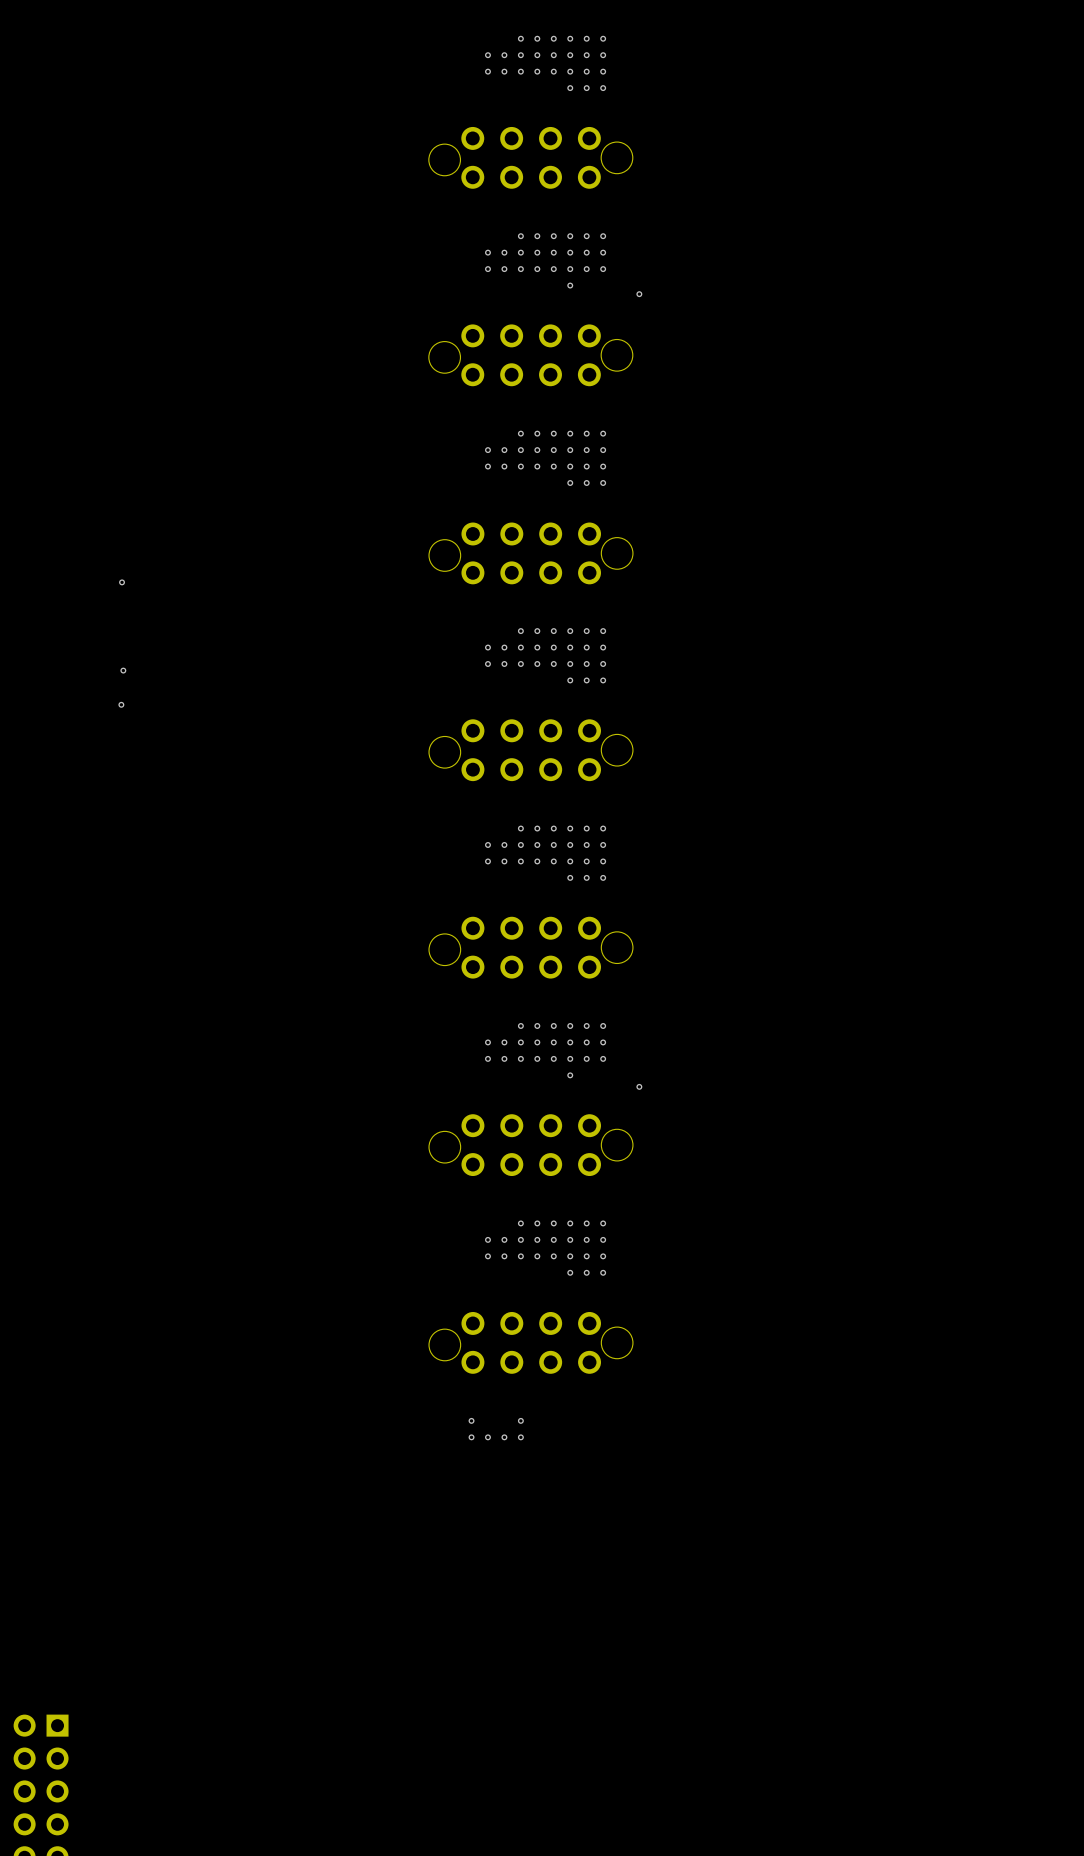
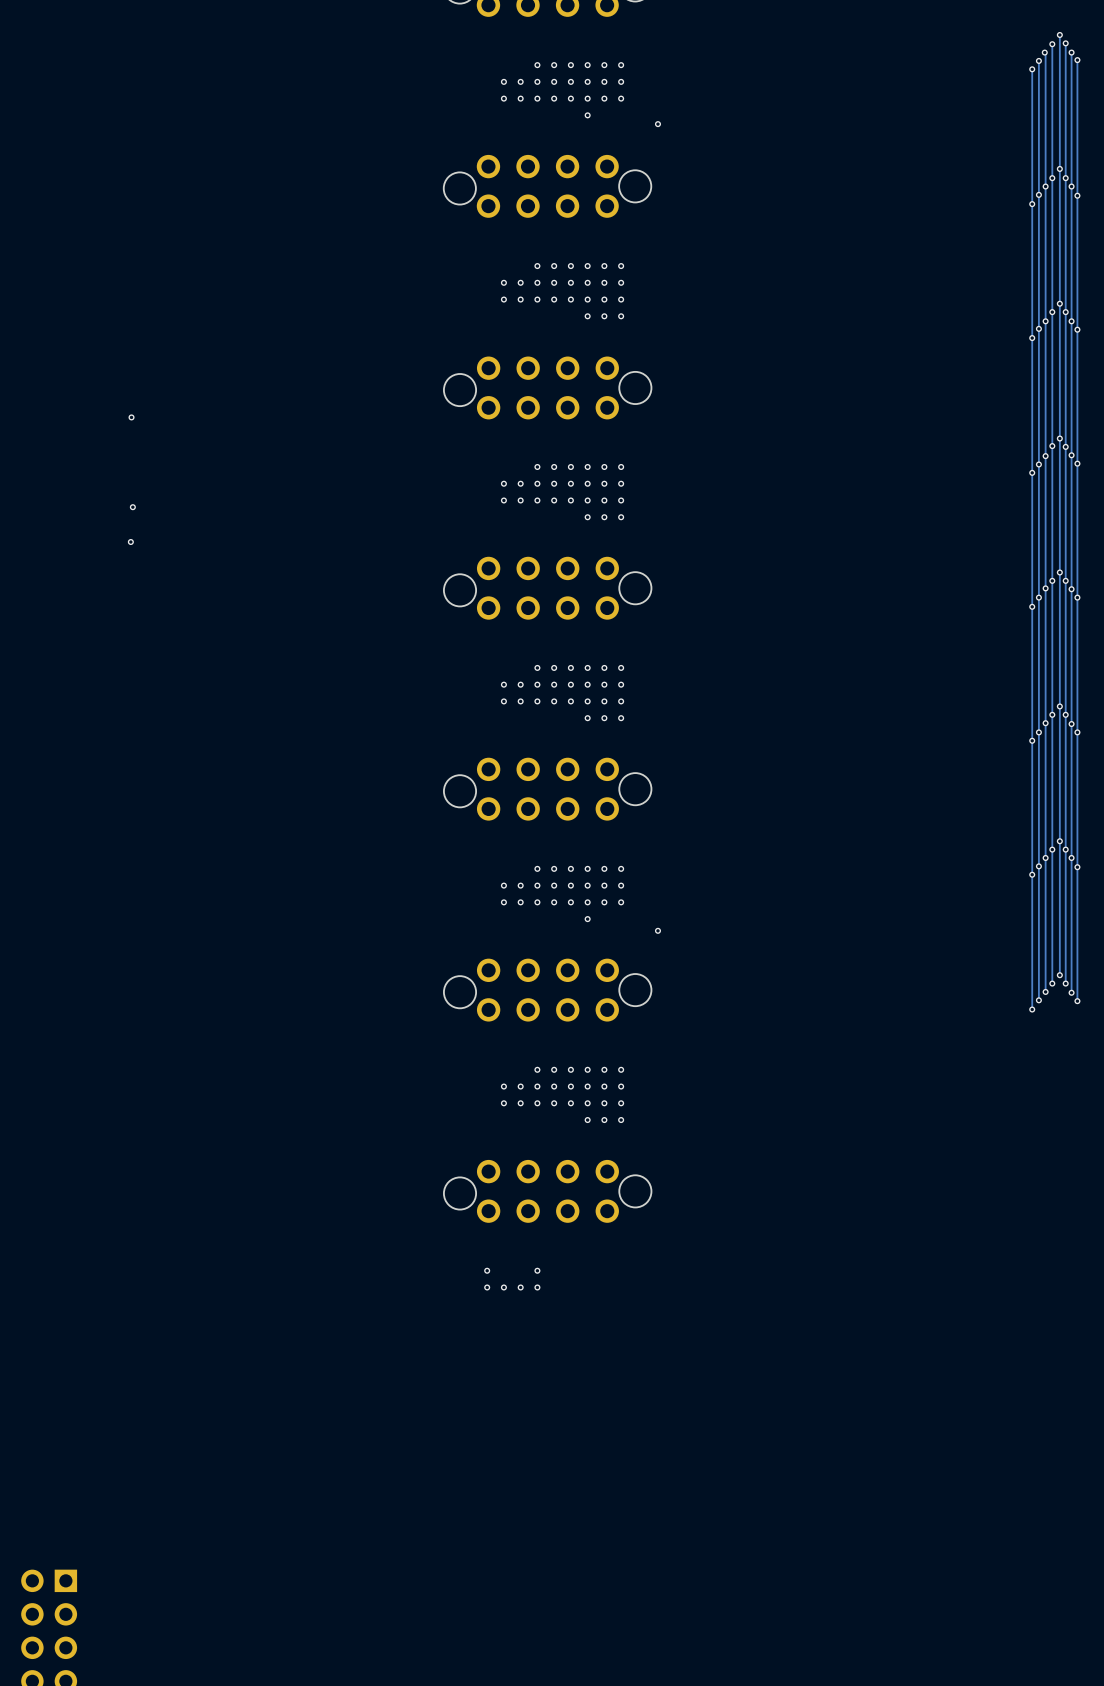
track: none -> (1059, 34) (1059, 975)
via: none -> (1059, 34)
track: none -> (1065, 43) (1065, 983)
via: none -> (1065, 43)
track: none -> (1052, 44) (1052, 983)
via: none -> (1052, 44)
track: none -> (1044, 52) (1045, 991)
via: none -> (1044, 52)
track: none -> (1071, 52) (1071, 992)
via: none -> (1071, 52)
track: none -> (1077, 60) (1077, 1001)
via: none -> (1077, 60)
track: none -> (1038, 60) (1038, 1000)
via: none -> (1038, 60)
track: none -> (1032, 69) (1032, 1009)
via: none -> (1032, 69)
via: none -> (1059, 168)
via: none -> (1052, 178)
via: none -> (1065, 178)
via: none -> (1045, 186)
via: none -> (1071, 186)
via: none -> (1038, 194)
via: none -> (1077, 195)
via: none -> (1032, 204)
via: none -> (1059, 303)
via: none -> (1052, 312)
via: none -> (1065, 312)
via: none -> (1045, 321)
via: none -> (1071, 321)
via: none -> (1038, 328)
via: none -> (1077, 329)
via: none -> (1032, 338)
via: none -> (1059, 438)
via: none -> (1052, 446)
via: none -> (1065, 446)
via: none -> (1071, 455)
via: none -> (1045, 456)
via: none -> (1077, 463)
via: none -> (1038, 464)
via: none -> (1032, 472)
via: none -> (1059, 572)
via: none -> (1052, 580)
via: none -> (1065, 580)
via: none -> (1045, 588)
via: none -> (1071, 589)
via: none -> (1038, 597)
via: none -> (1077, 597)
via: none -> (1032, 606)
via: none -> (1059, 706)
via: none -> (1052, 714)
via: none -> (1065, 714)
via: none -> (1045, 723)
via: none -> (1071, 724)
via: none -> (1038, 732)
via: none -> (1077, 732)
via: none -> (1032, 740)
via: none -> (1059, 841)
via: none -> (1052, 849)
via: none -> (1065, 849)
via: none -> (1045, 857)
via: none -> (1071, 857)
via: none -> (1038, 866)
via: none -> (1077, 867)
via: none -> (1032, 874)
via: none -> (1059, 975)
via: none -> (1052, 983)
via: none -> (1065, 983)
via: none -> (1045, 991)
via: none -> (1071, 992)
via: none -> (1038, 1000)
via: none -> (1077, 1001)
via: none -> (1032, 1009)

